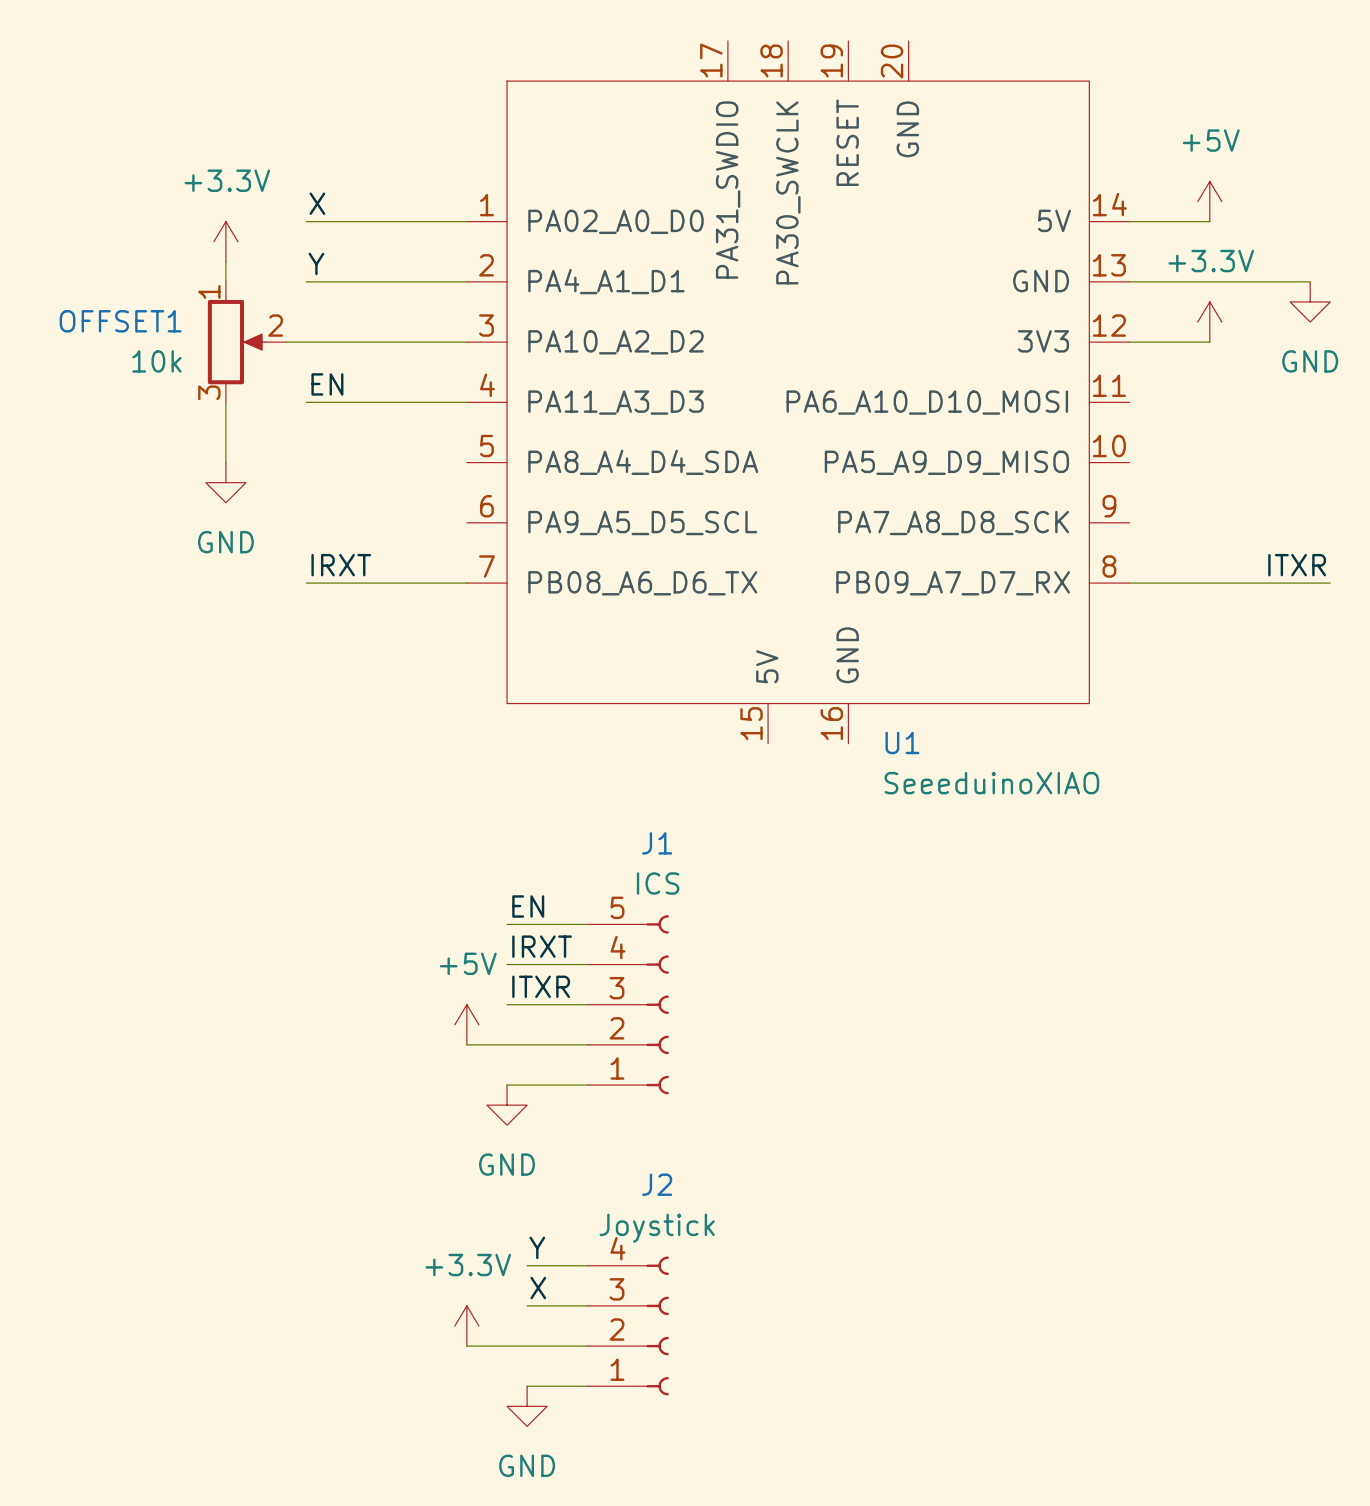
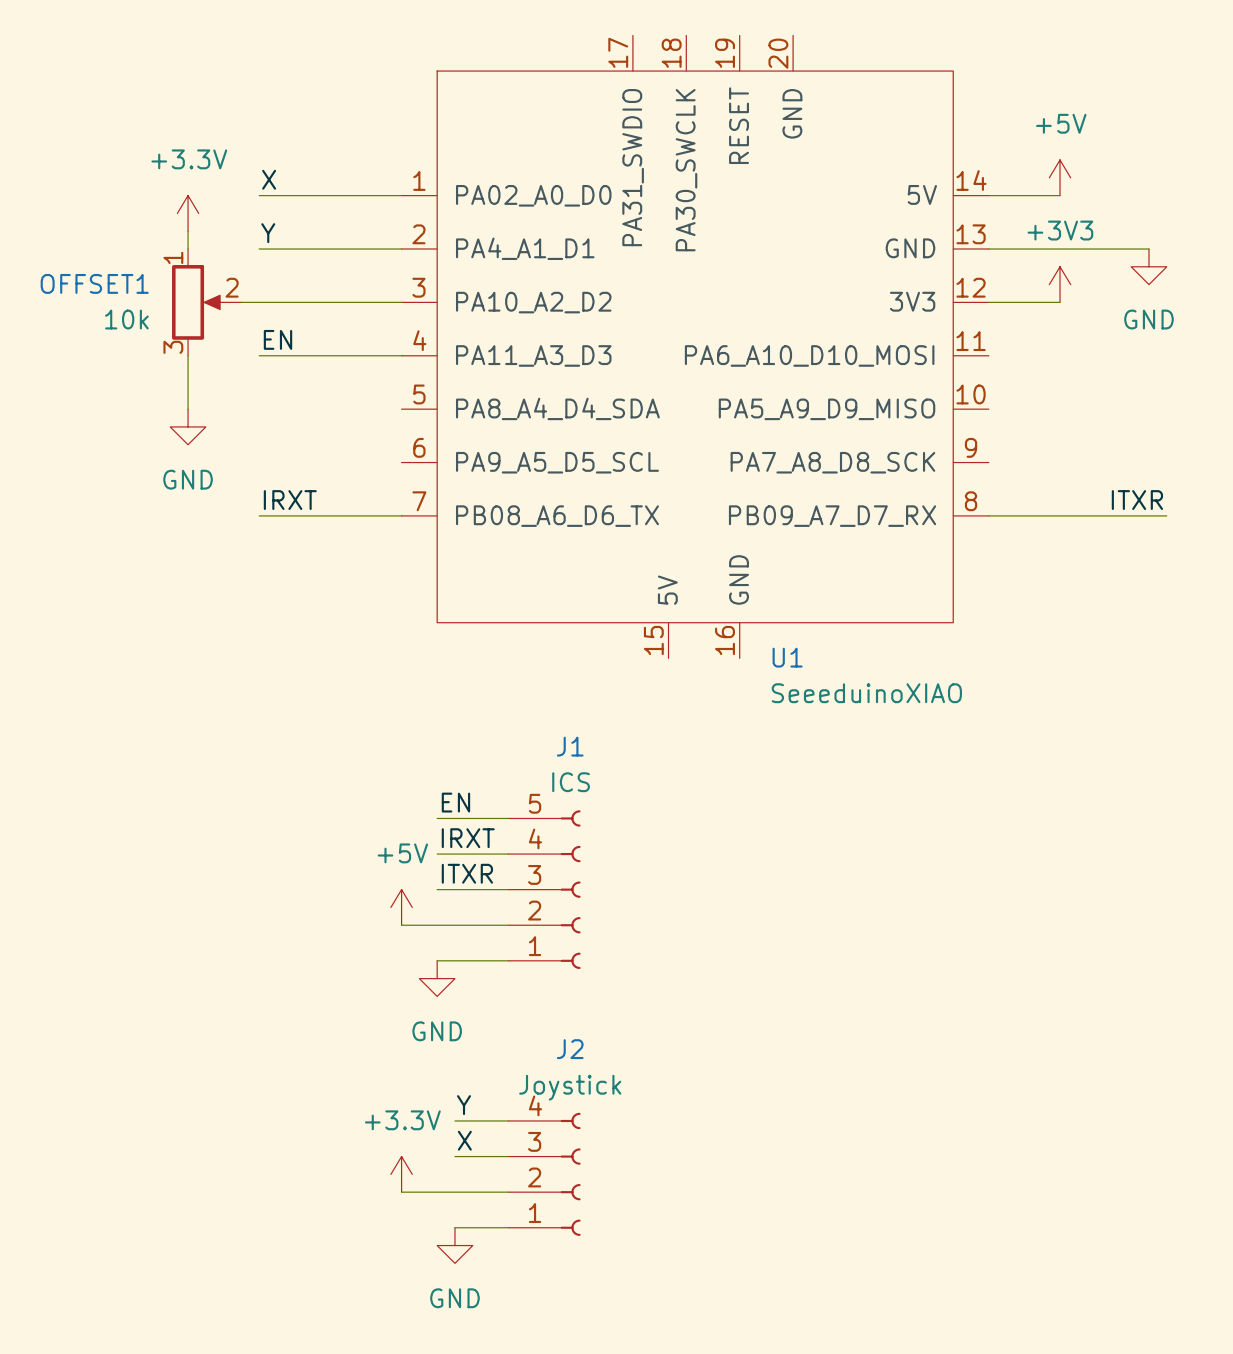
power symbol: +3.3V (1209, 322) -> +3V3 (1060, 284)

